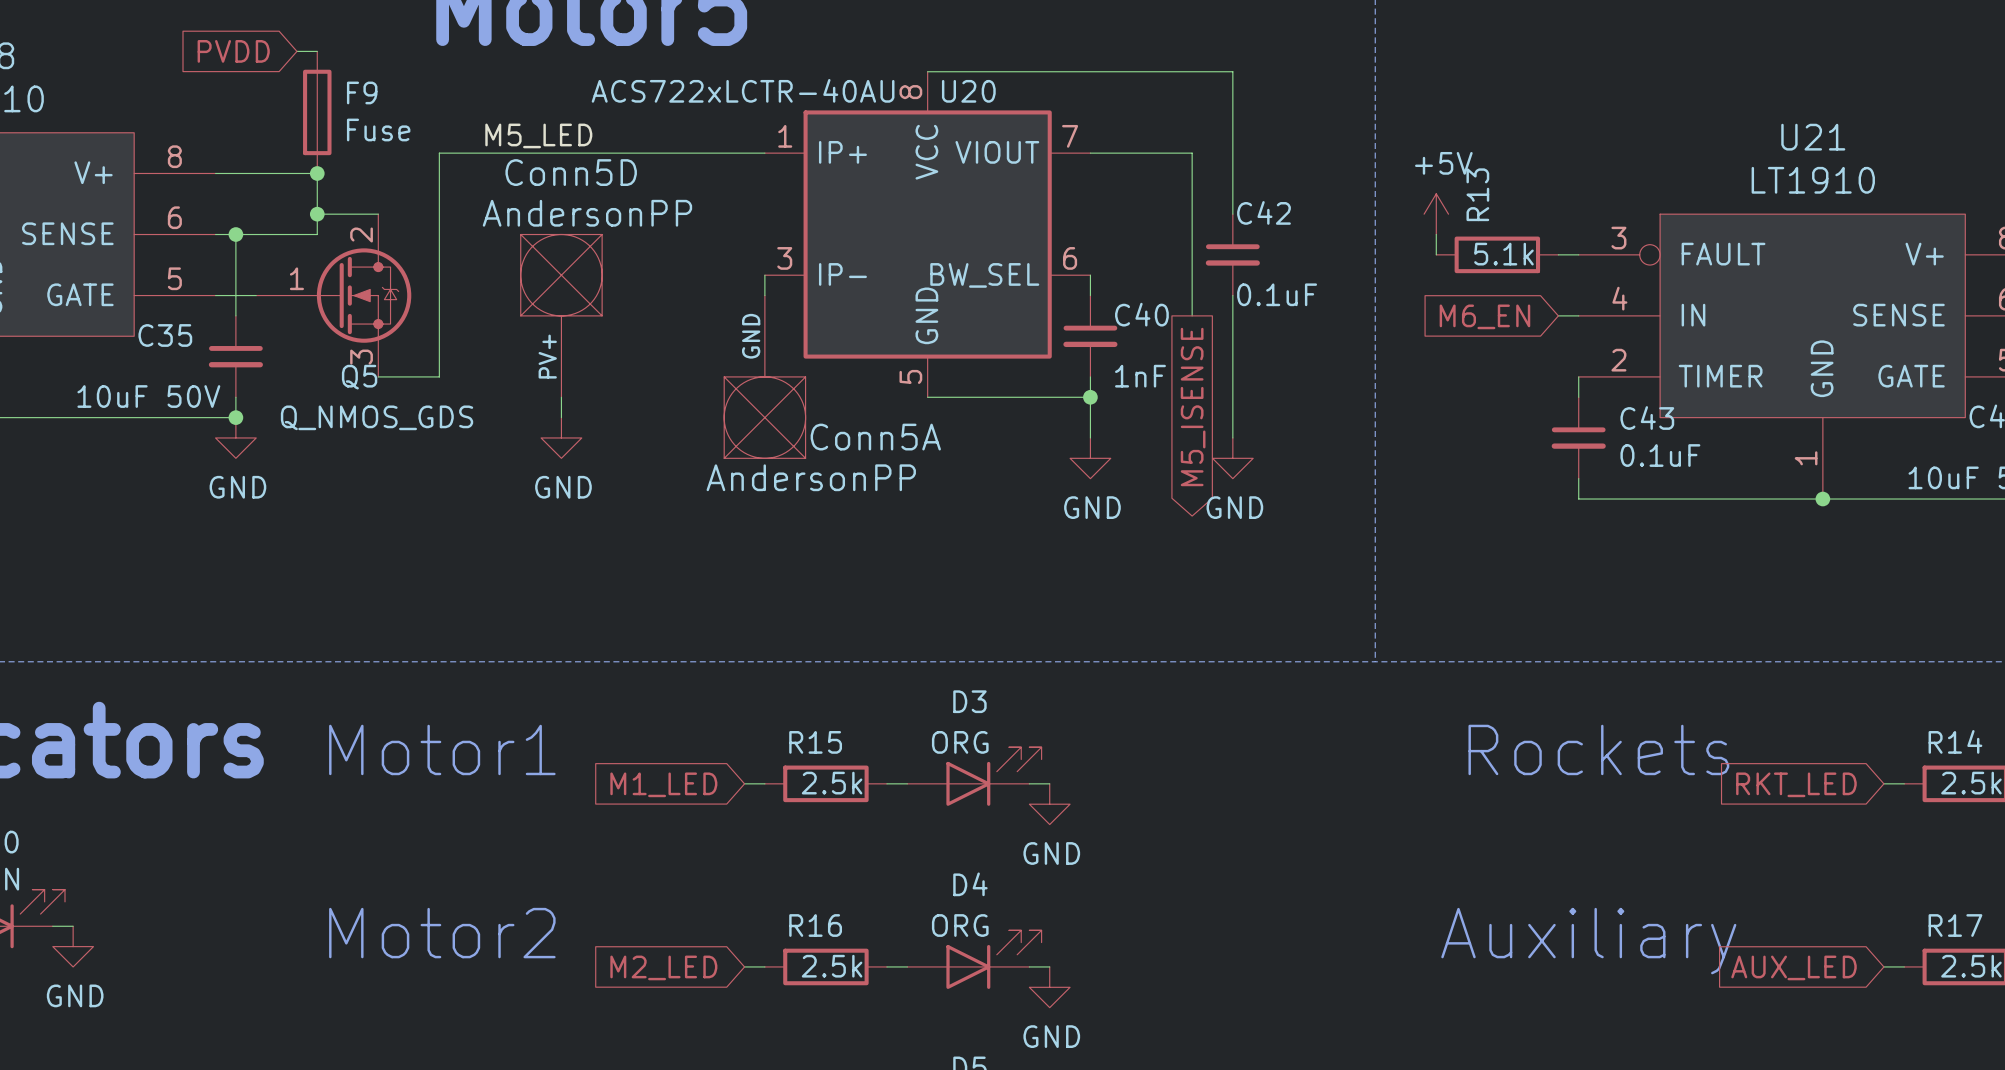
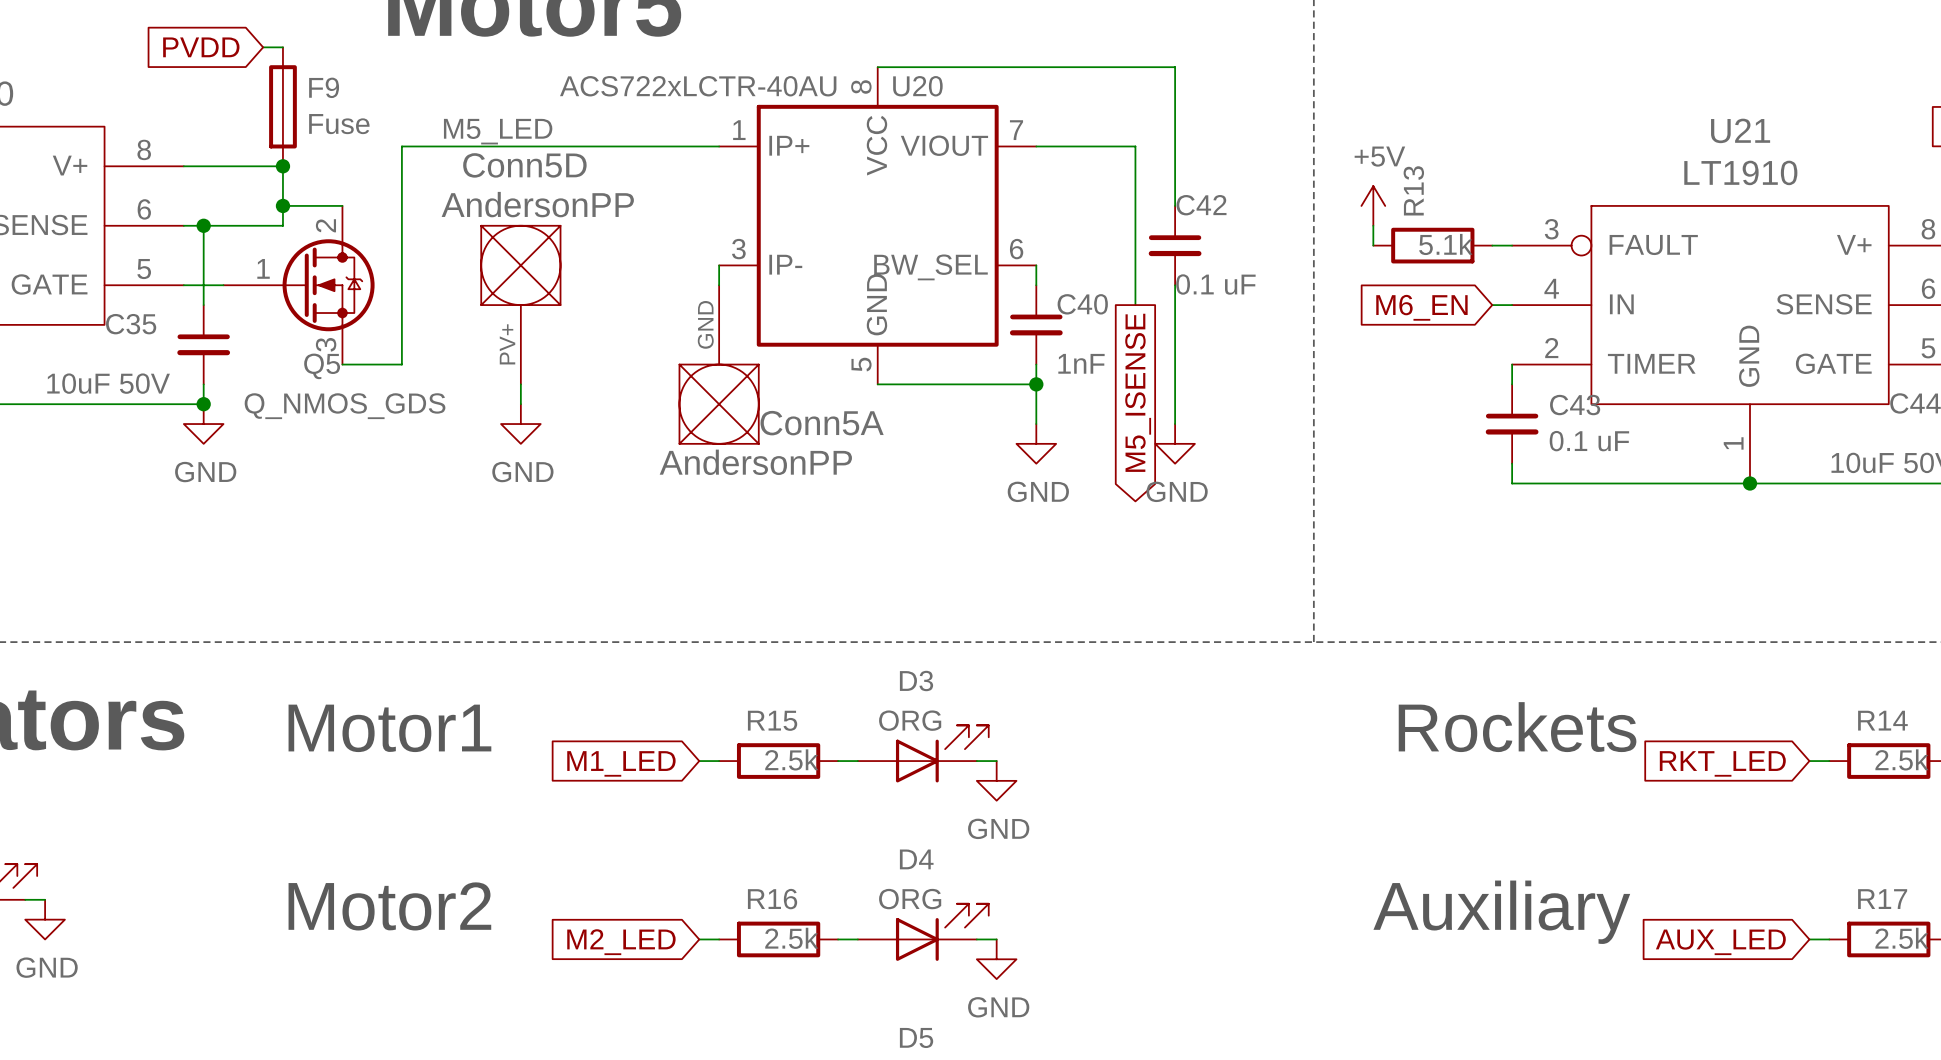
C42 value: 0.1uF (1277, 294) -> 0.1 uF (1215, 284)
C43 value: 0.1uF (1660, 455) -> 0.1 uF (1589, 441)

